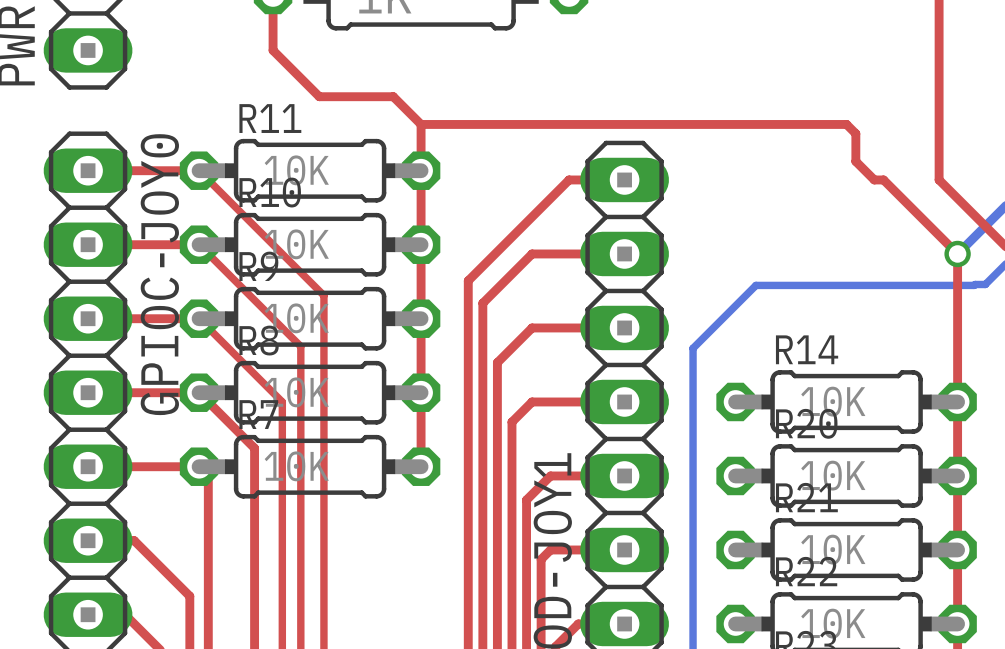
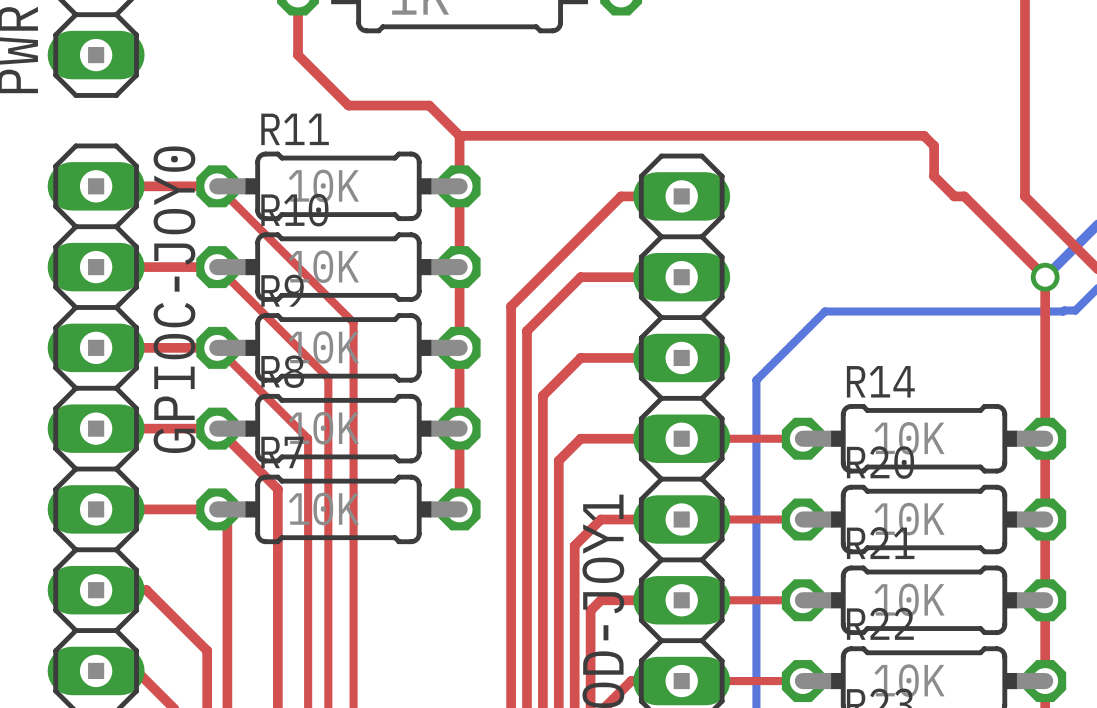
top track: none -> (681, 438) (802, 438)
top track: none -> (681, 519) (802, 519)
top track: none -> (681, 600) (802, 600)
top track: none -> (681, 681) (802, 681)

